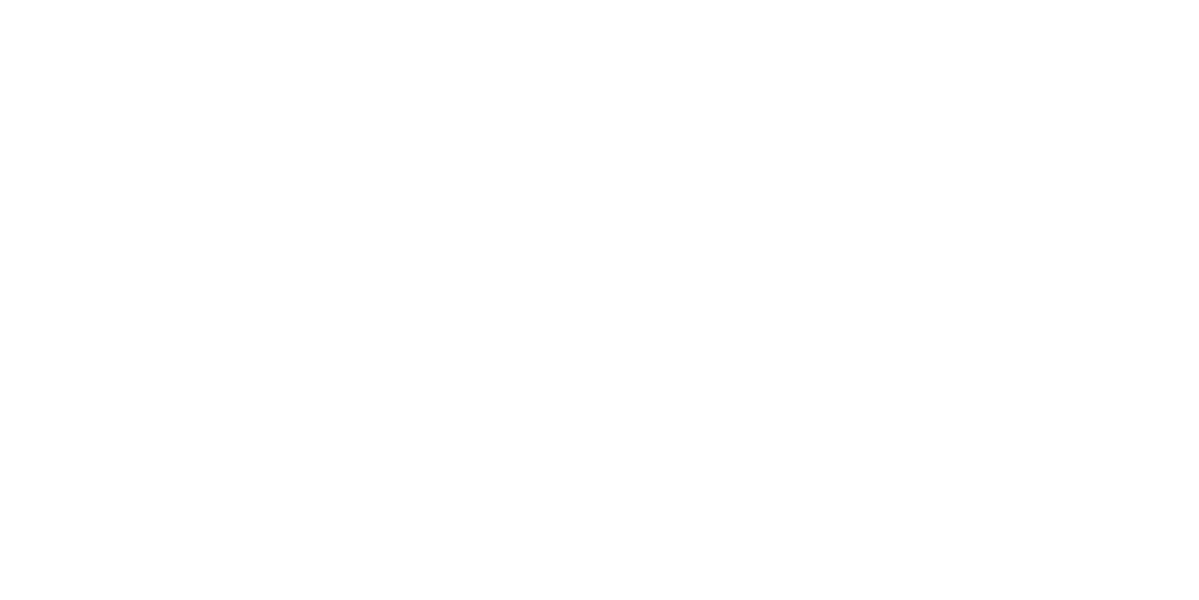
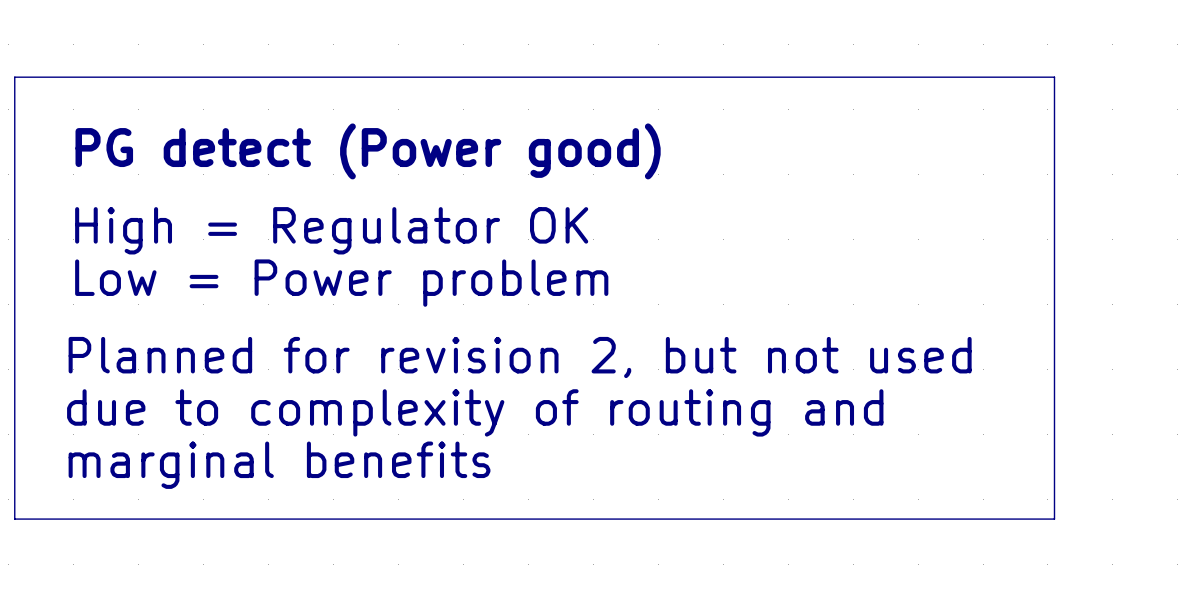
line: none -> (14, 77) (1054, 77) (1054, 519) (14, 519) (14, 77)
text: none -> PG detect (Power good) (368, 151)
text: none -> High = Regulator OK (331, 230)
text: none -> Low = Power problem (341, 283)
text: none -> Planned for revision 2, but not used (520, 357)
text: none -> due to complexity of routing and (475, 412)
text: none -> marginal benefits (279, 465)

